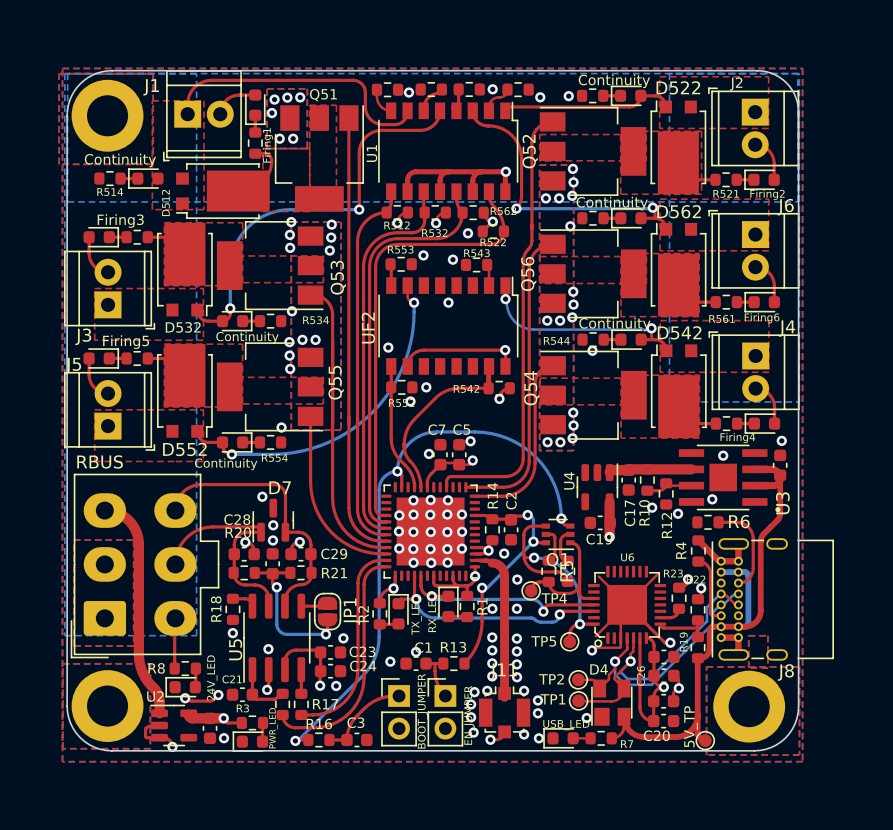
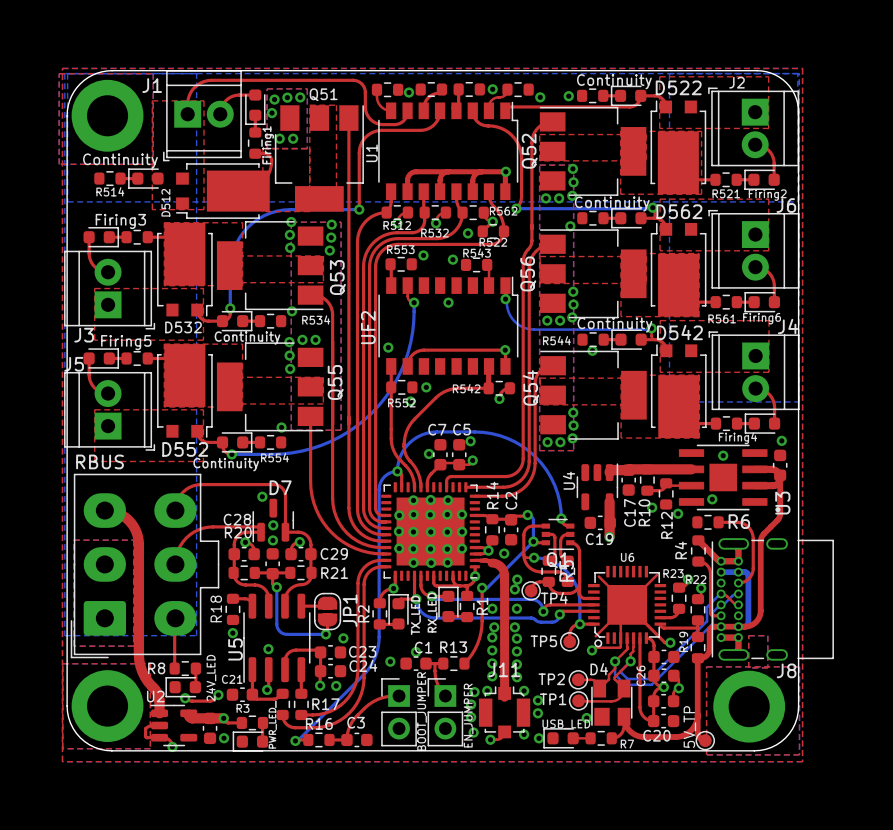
via: none -> (514, 589)
via: none -> (494, 627)
via: none -> (514, 627)

